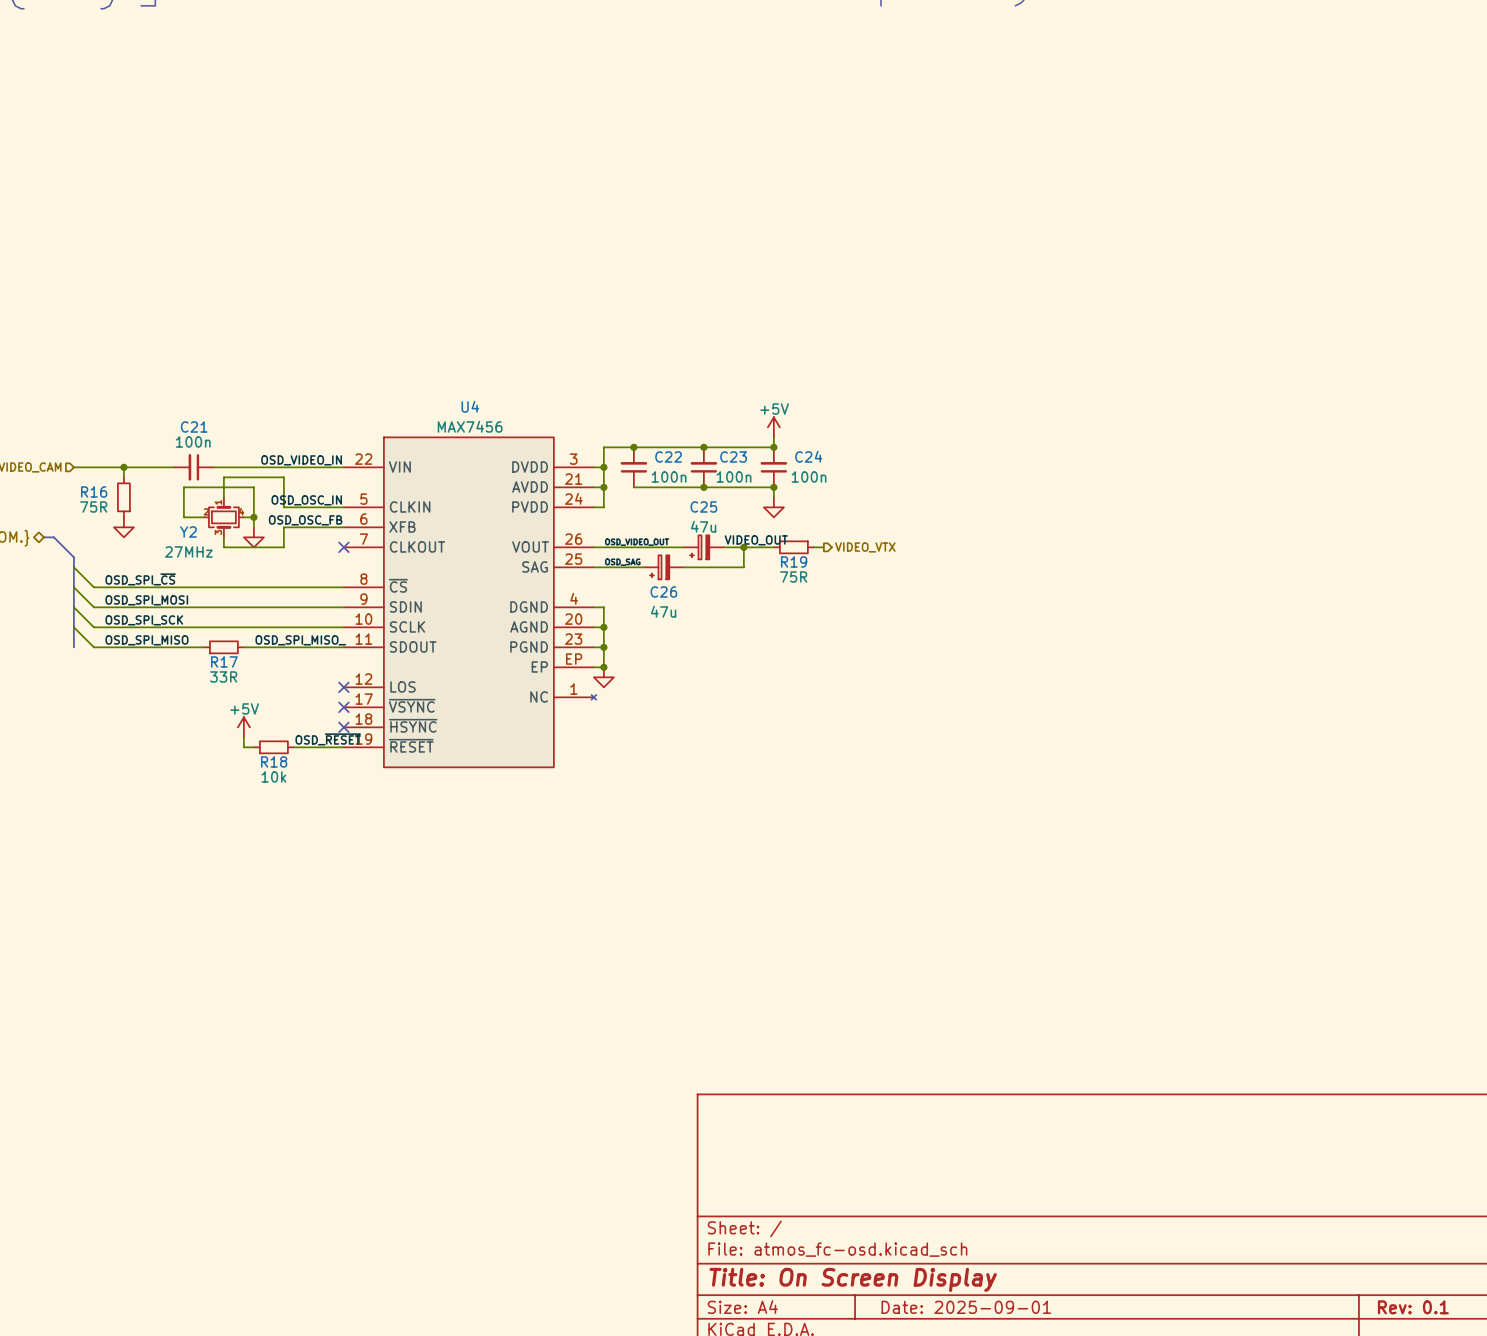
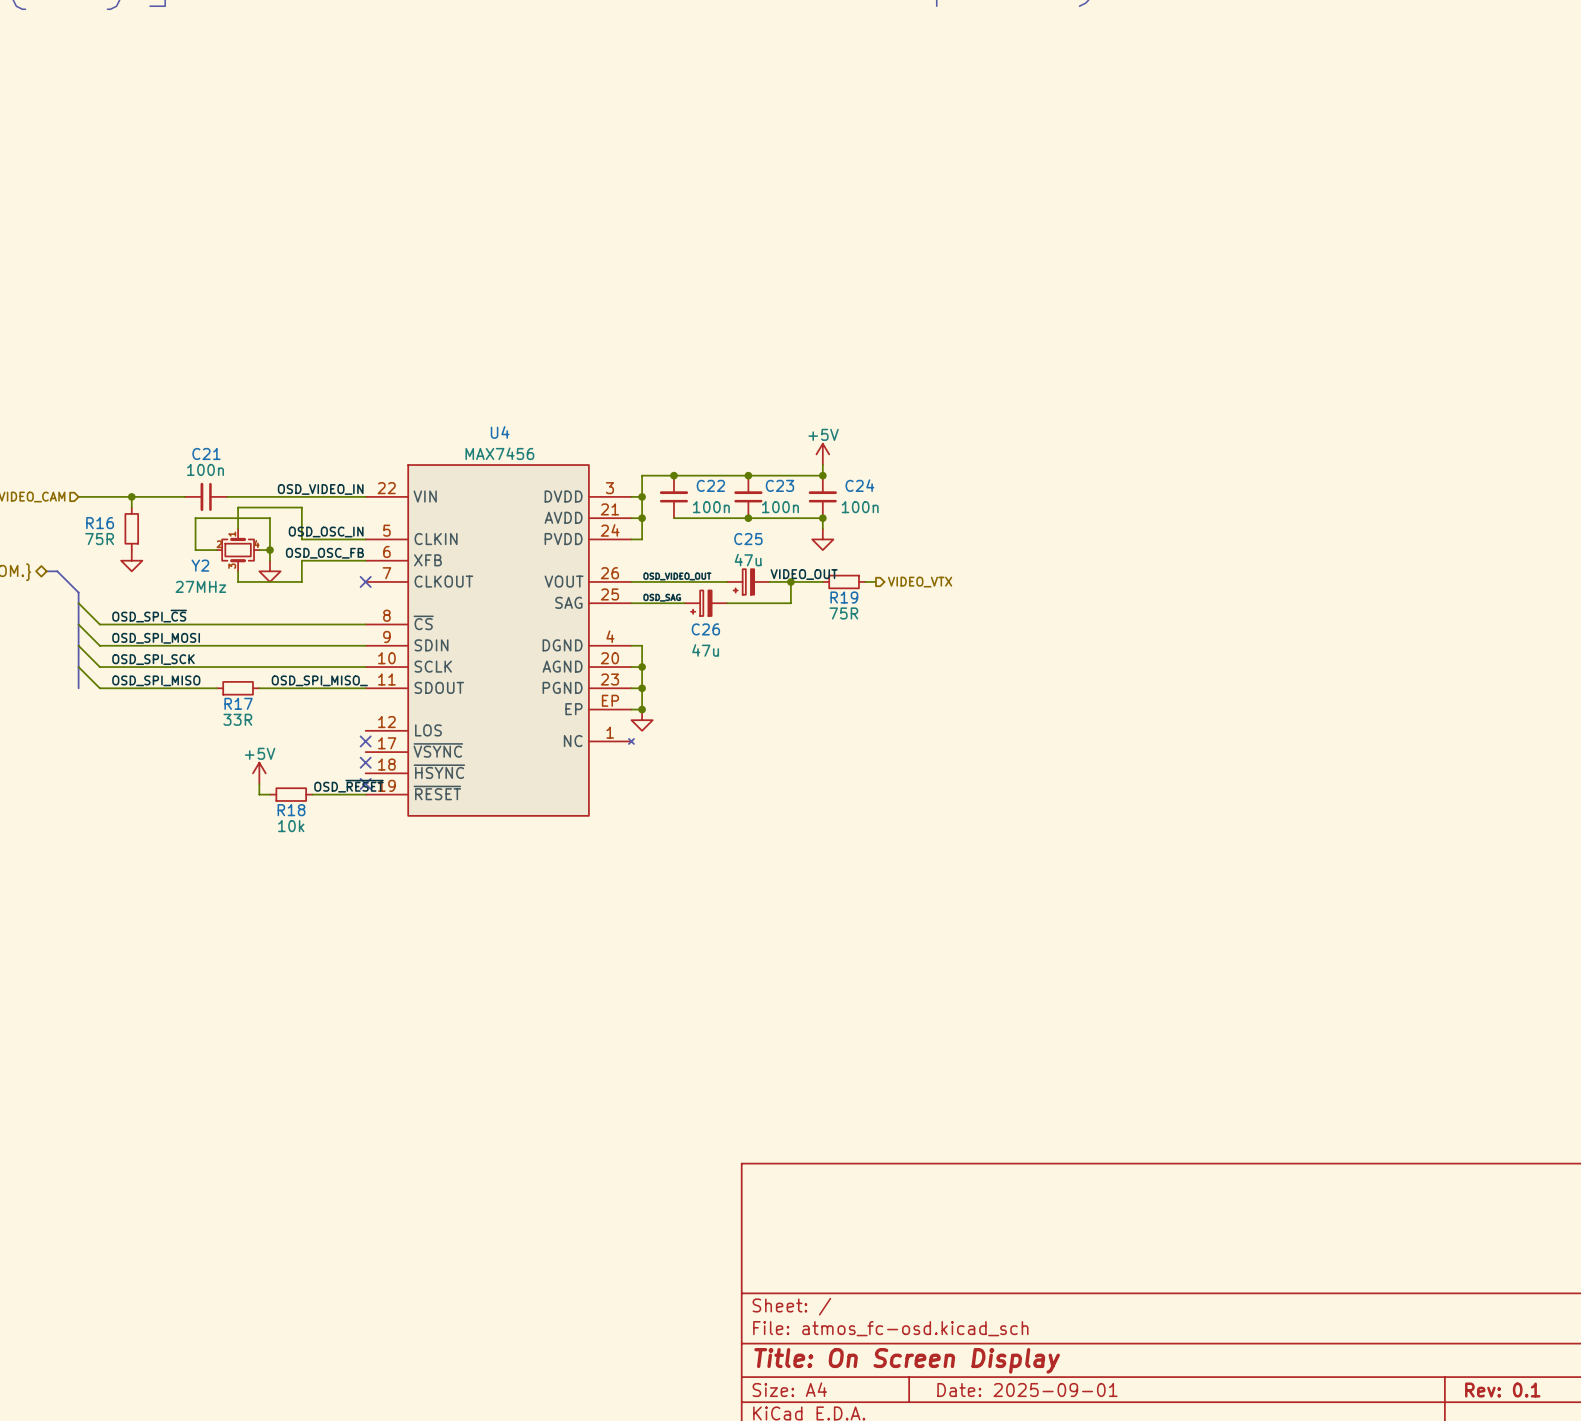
no-connect mark: (343, 687) -> none
no-connect mark: none -> (365, 741)
no-connect mark: (343, 707) -> none
no-connect mark: none -> (365, 762)
no-connect mark: (343, 727) -> none
no-connect mark: none -> (365, 783)

